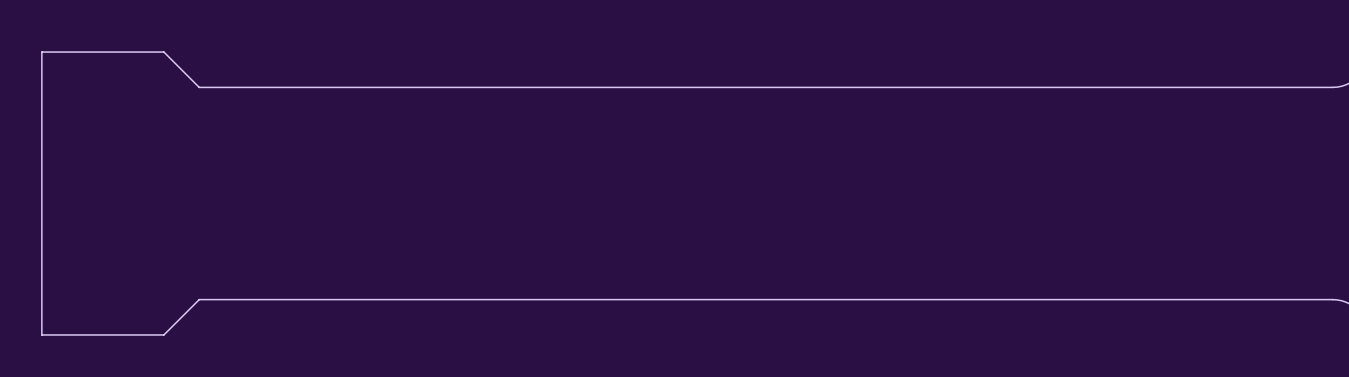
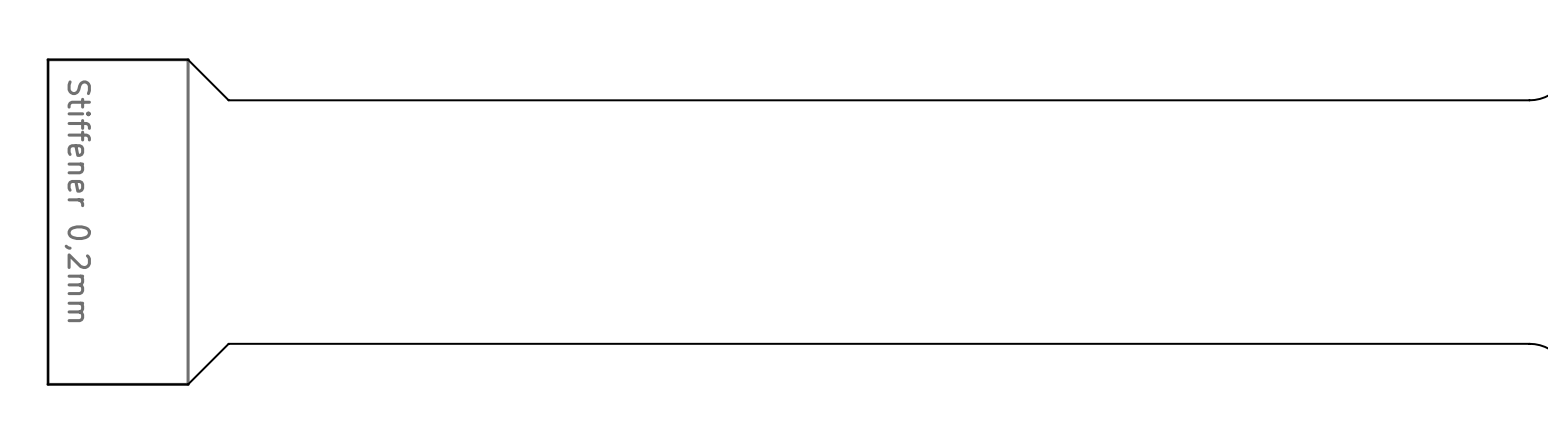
line: none -> (188, 59) (188, 384) (48, 384) (48, 59) (188, 59)
text: none -> Stiffener 0,2mm (77, 201)

